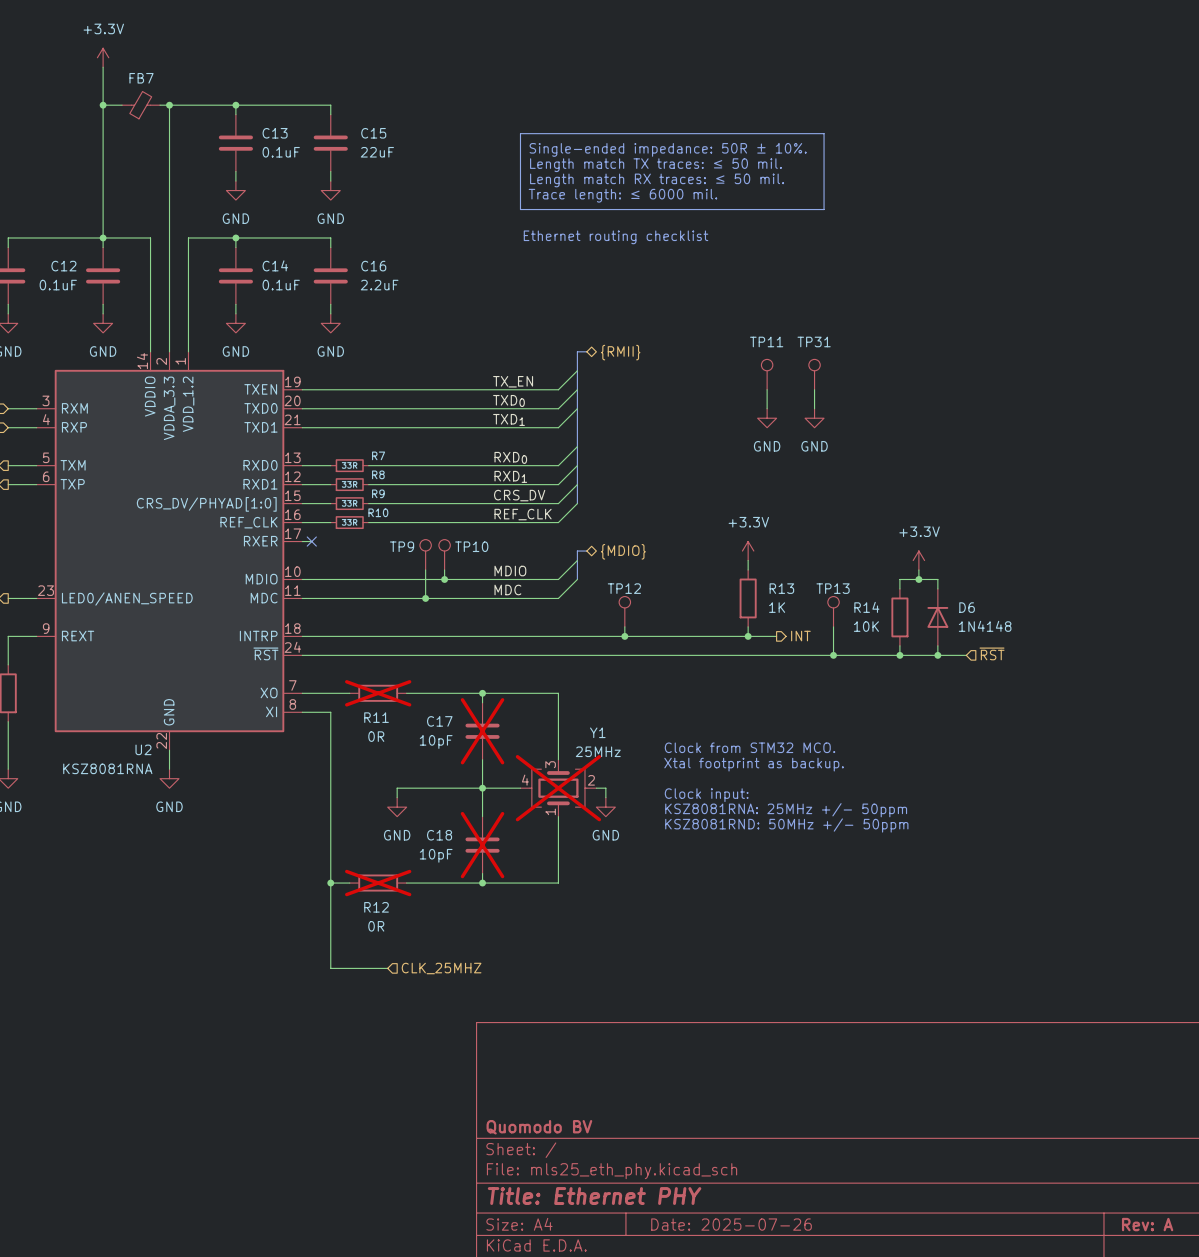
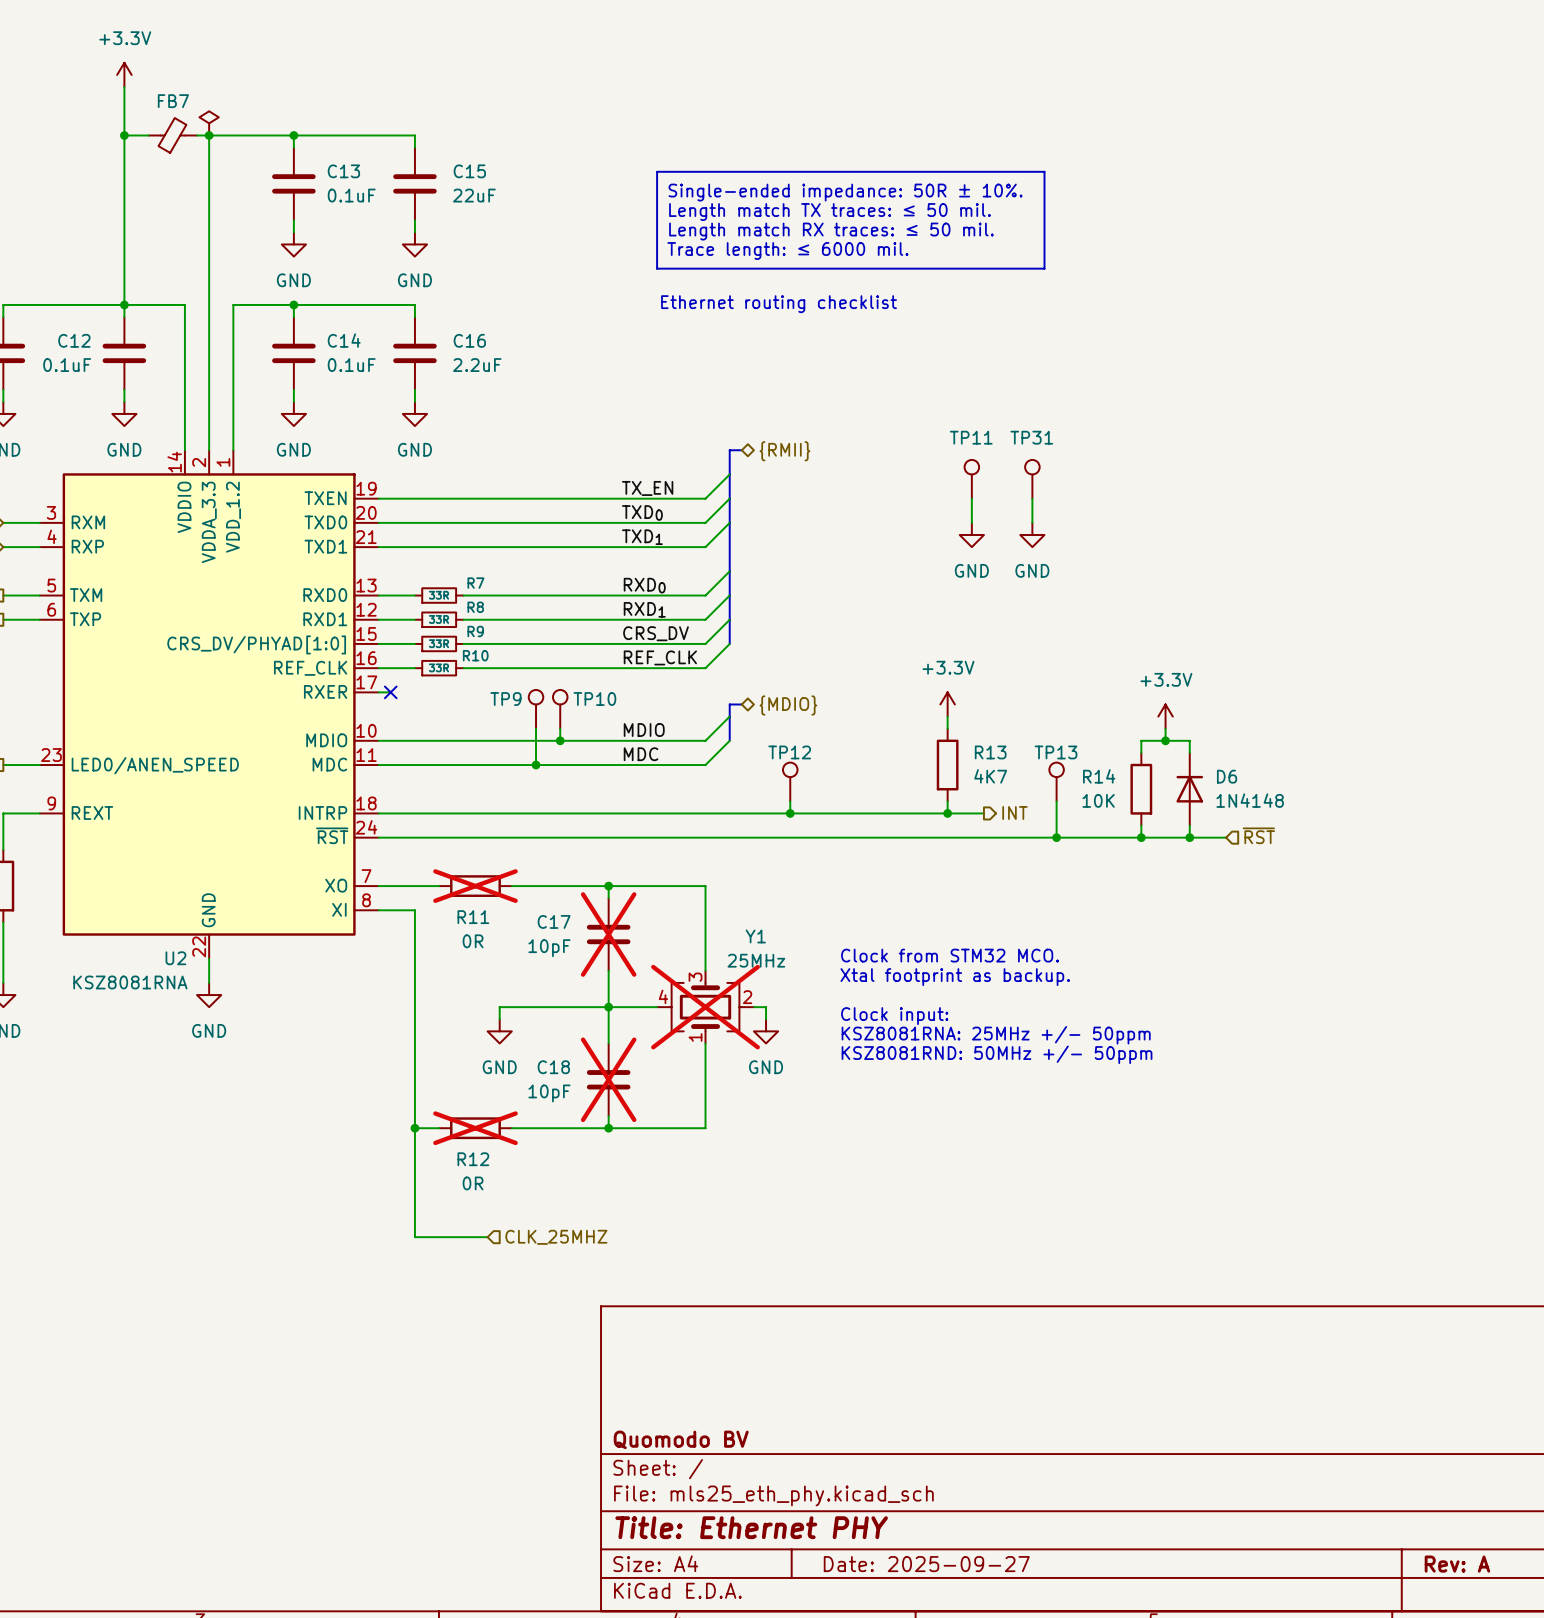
power symbol: none -> (209, 123)
R13 value: 1K (777, 607) -> 4K7 (990, 776)
title block: Date: 2025-07-26 (731, 1224) -> Date: 2025-09-27 (926, 1564)

